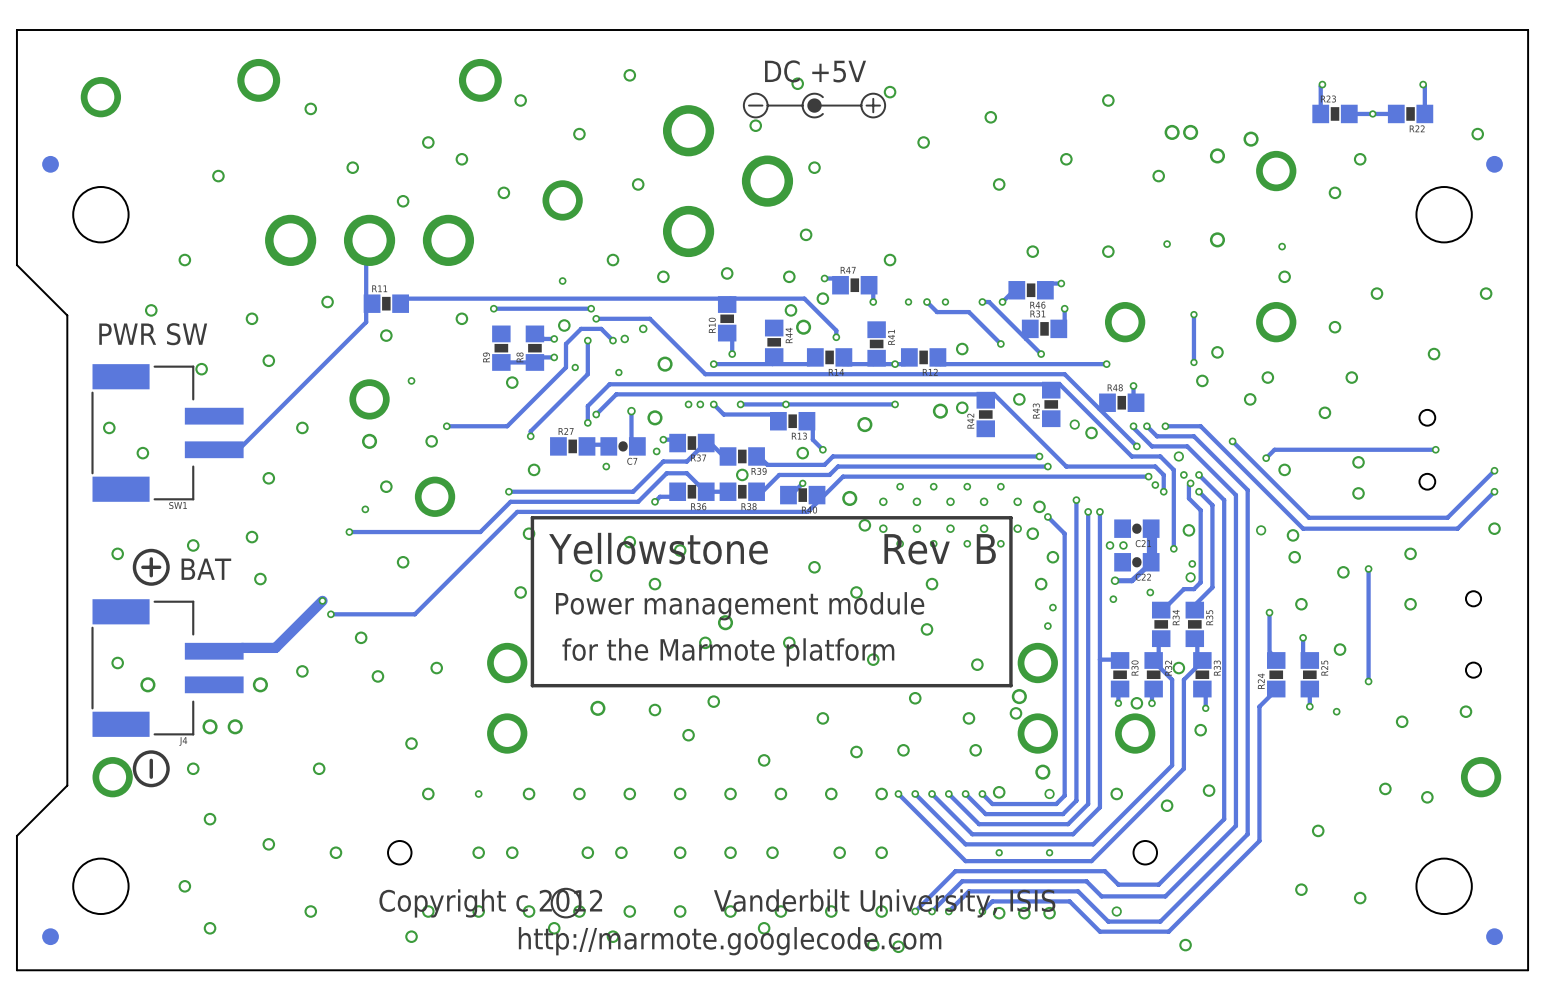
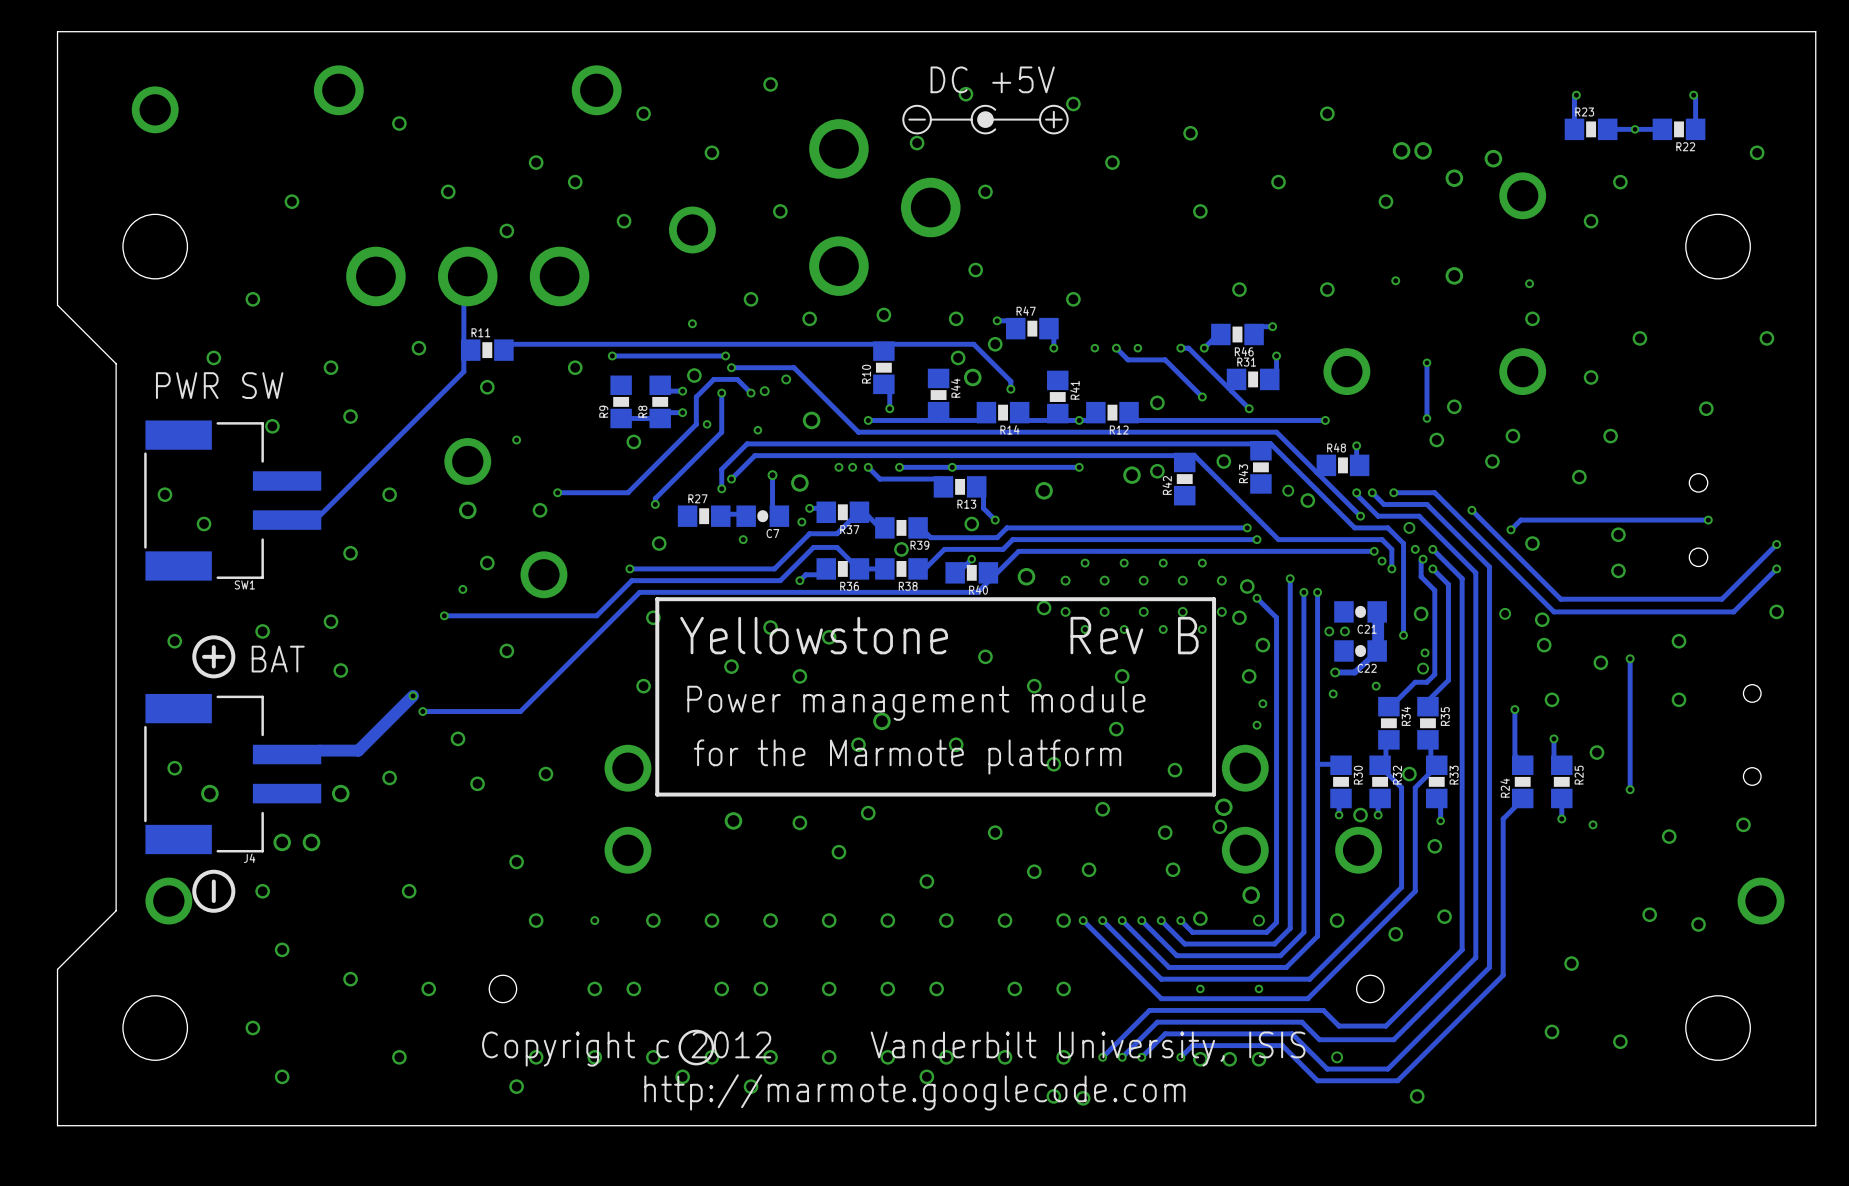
part: (50, 164) -> none
part: (1494, 164) -> none
part: (50, 936) -> none
part: (1494, 936) -> none

